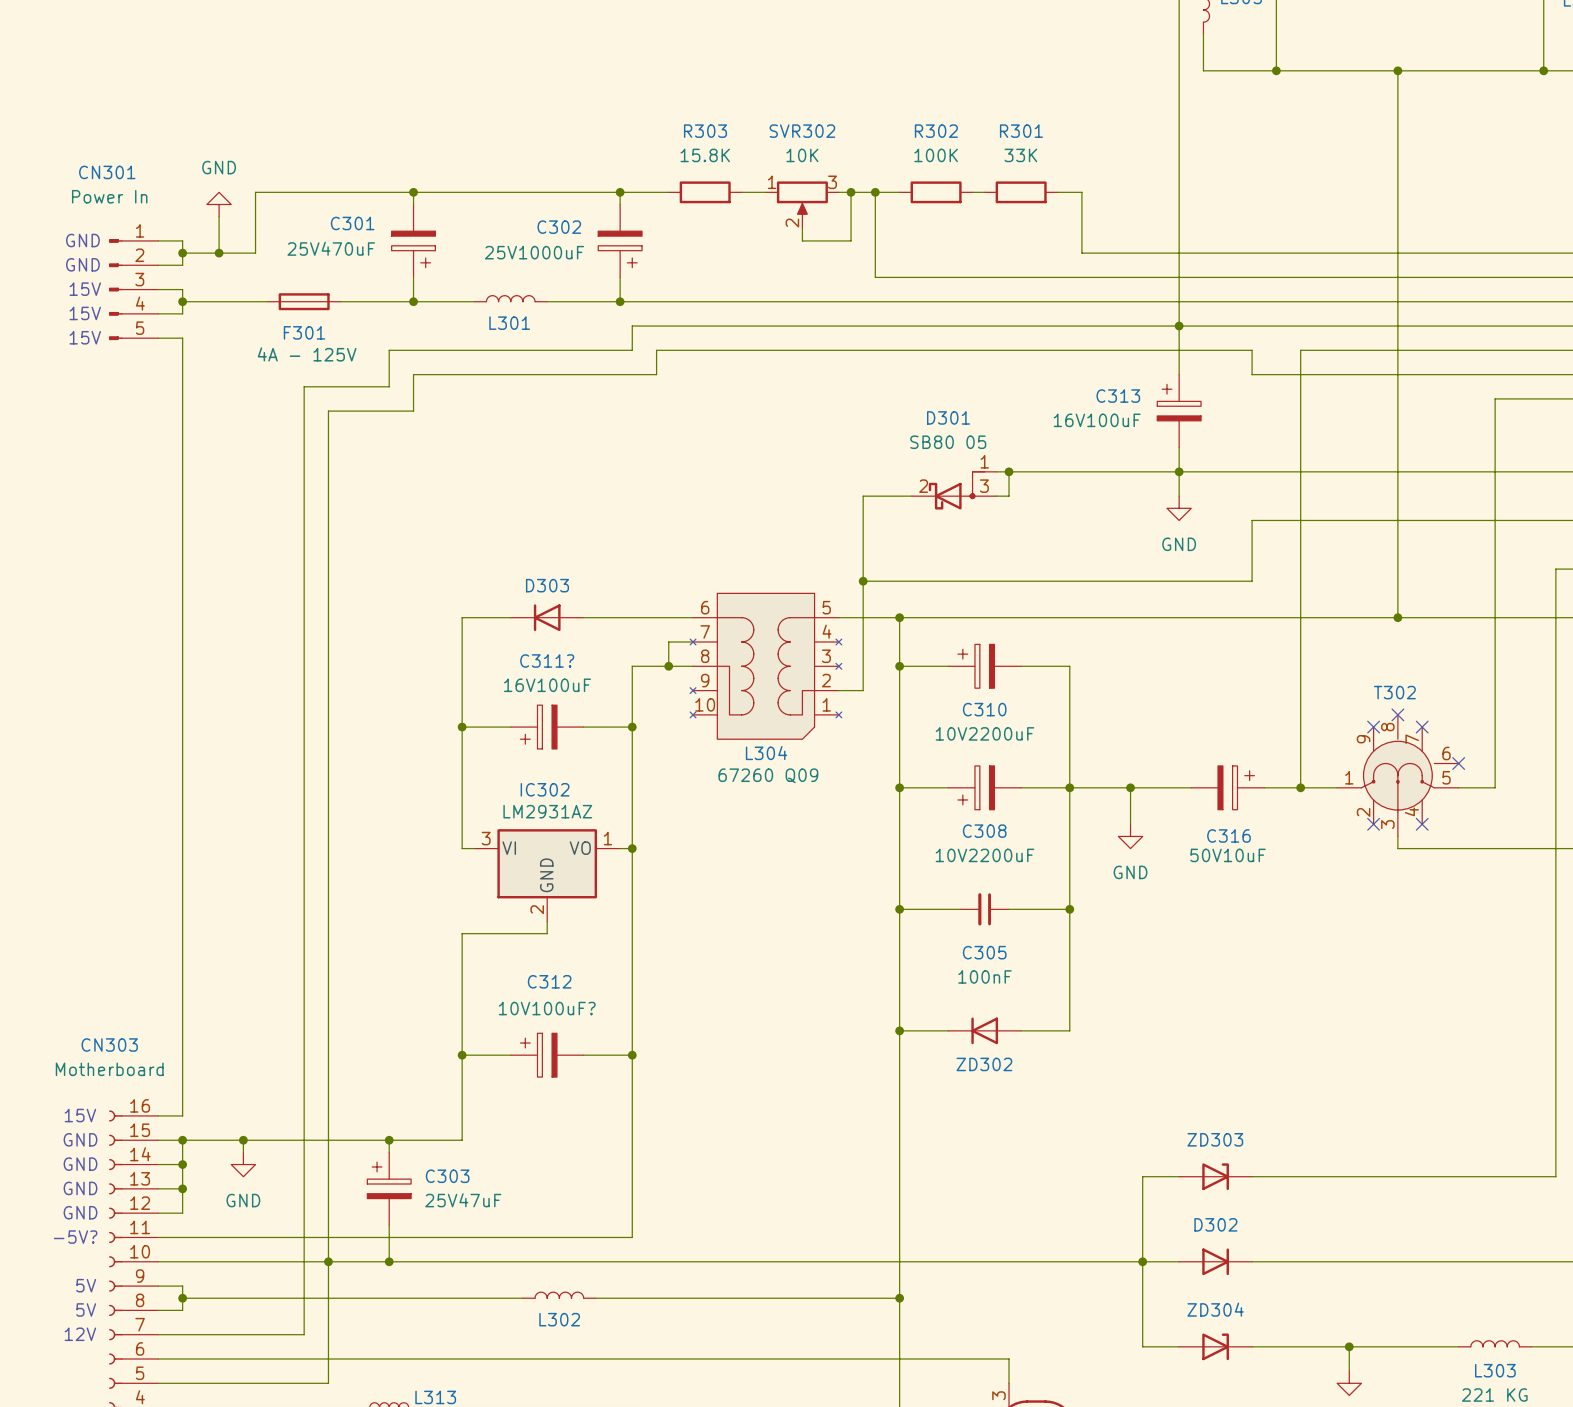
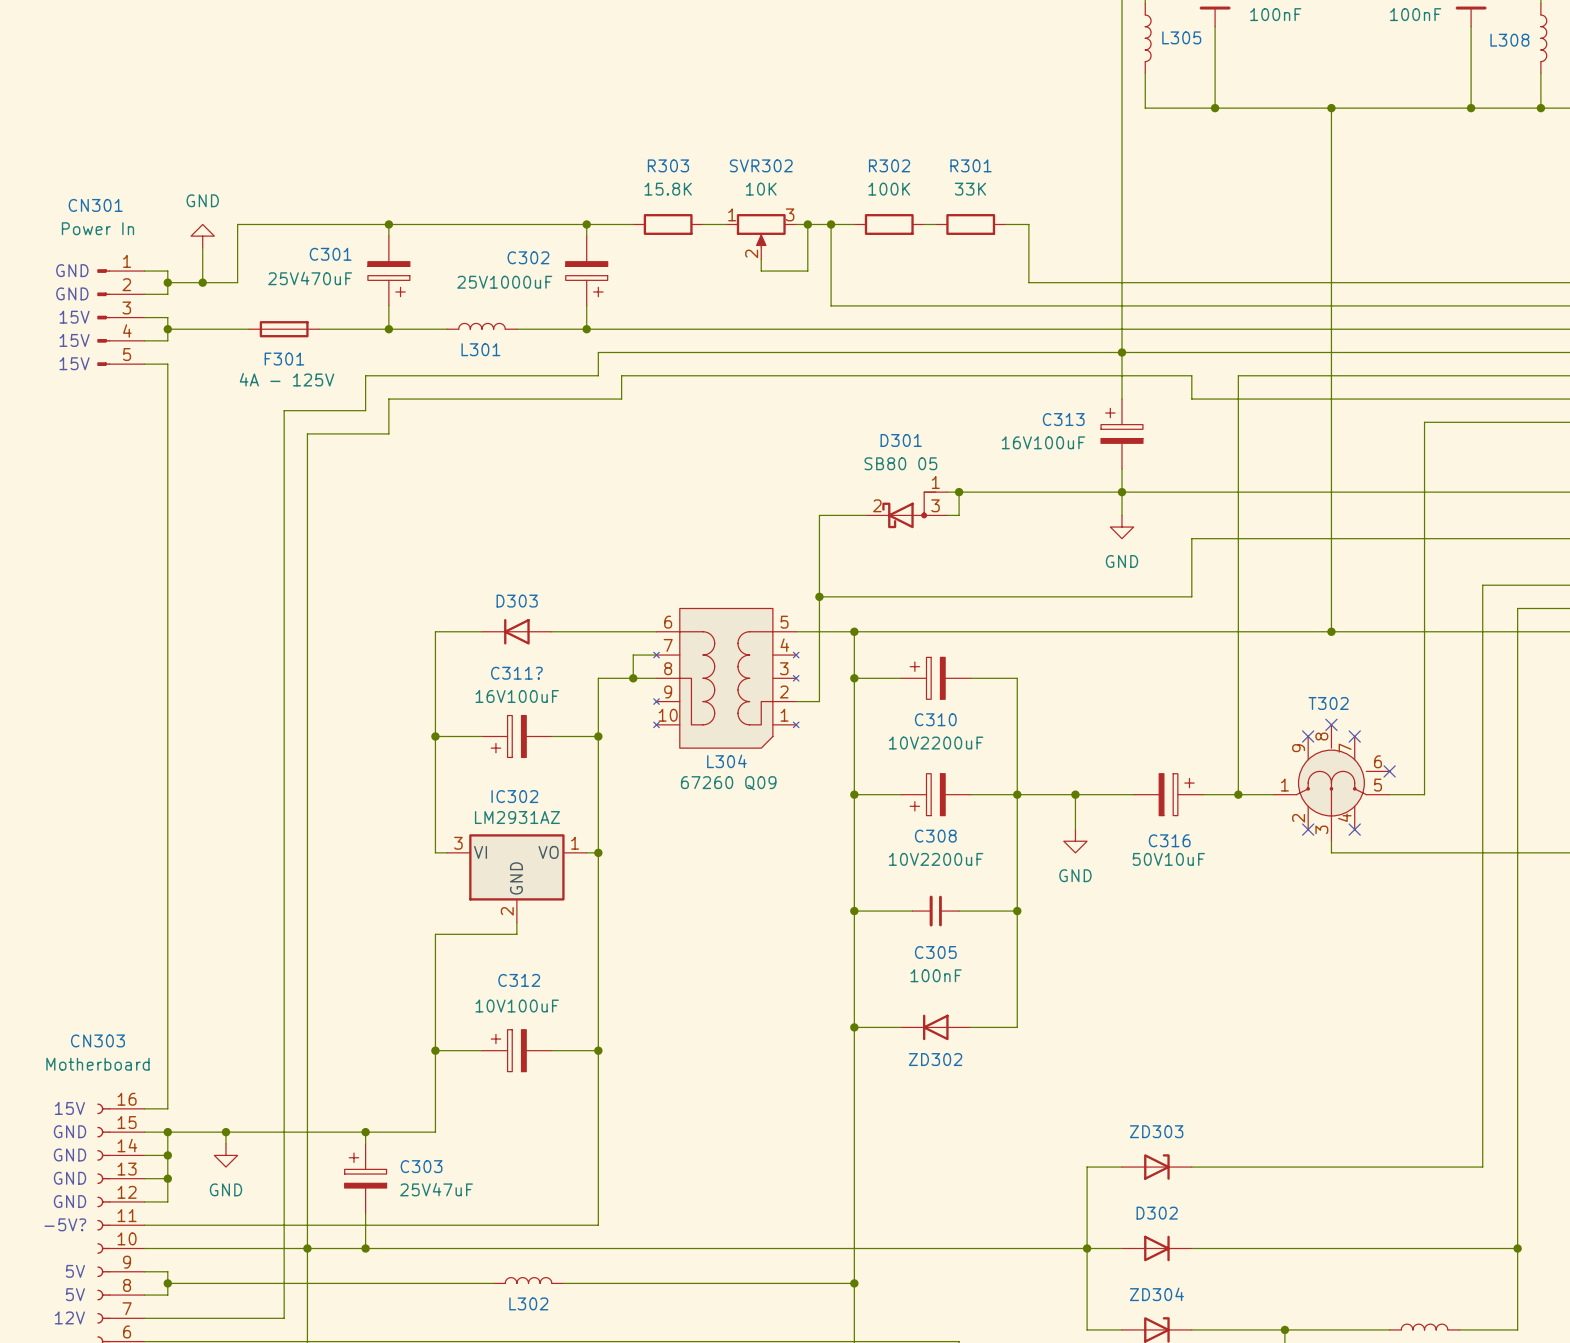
C312 value: 10V100uF? (547, 1008) -> 10V100uF (517, 1006)

